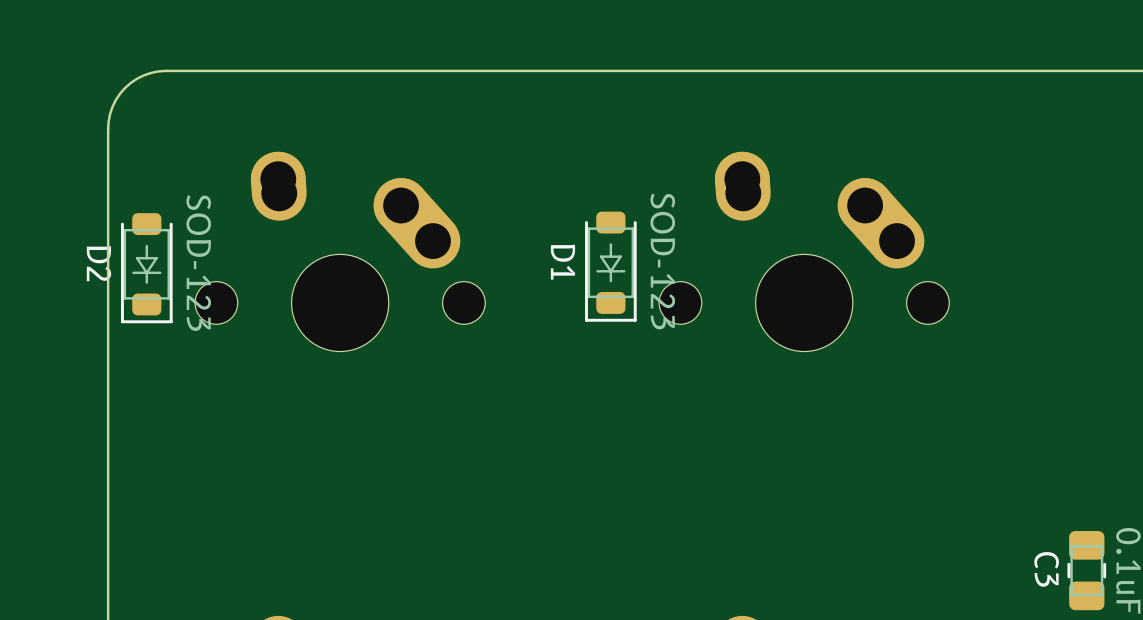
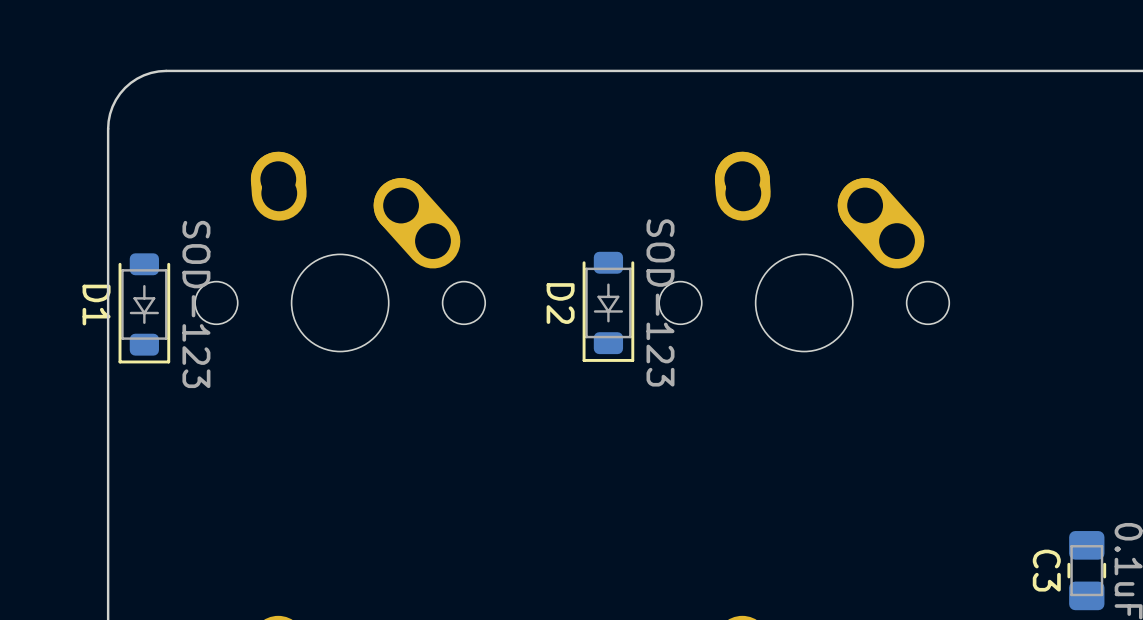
D1 position: (610, 266) -> (144, 308)
D2 position: (146, 268) -> (608, 306)

